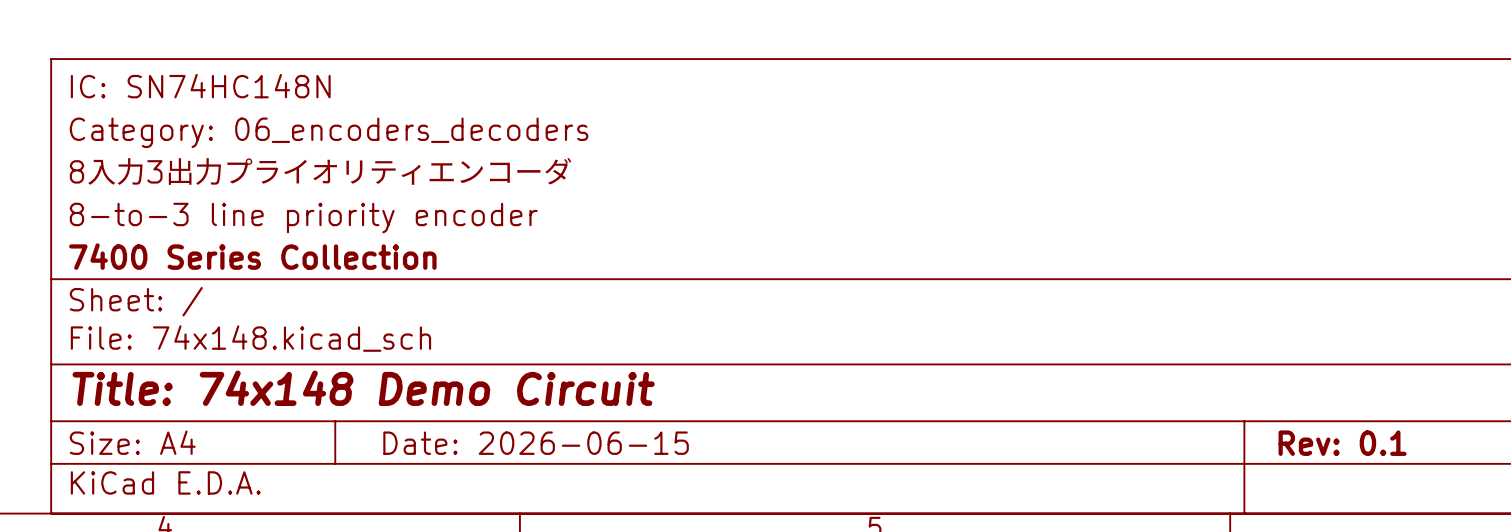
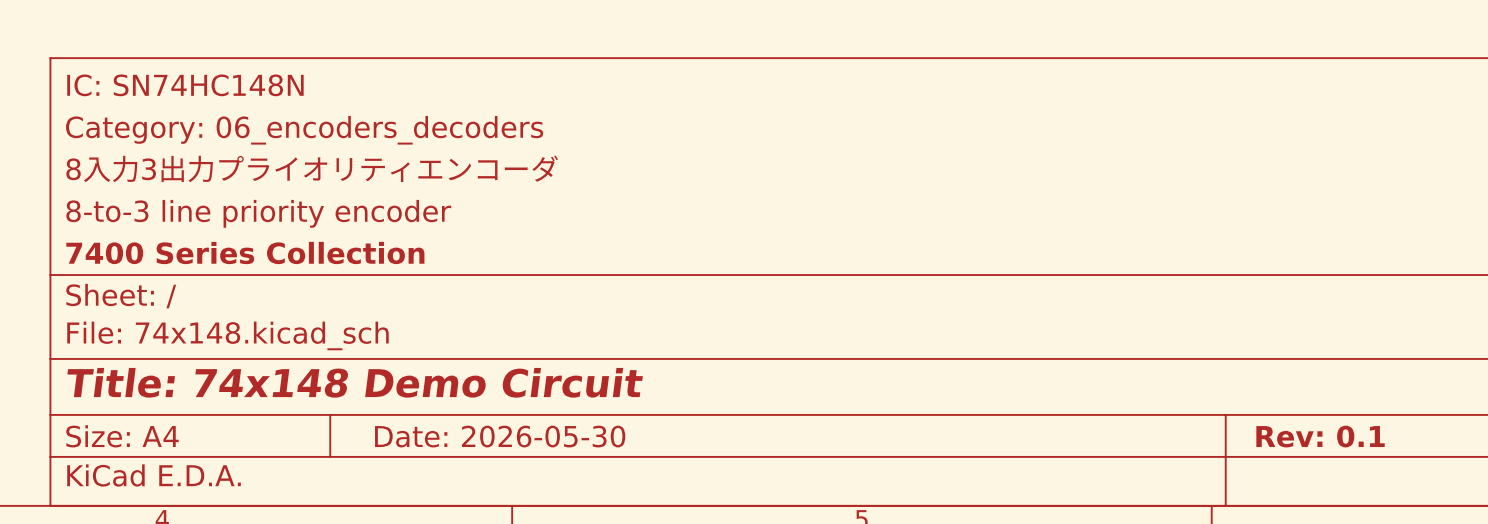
title block: Date: 2026-06-15 (536, 443) -> Date: 2026-05-30 (500, 436)

